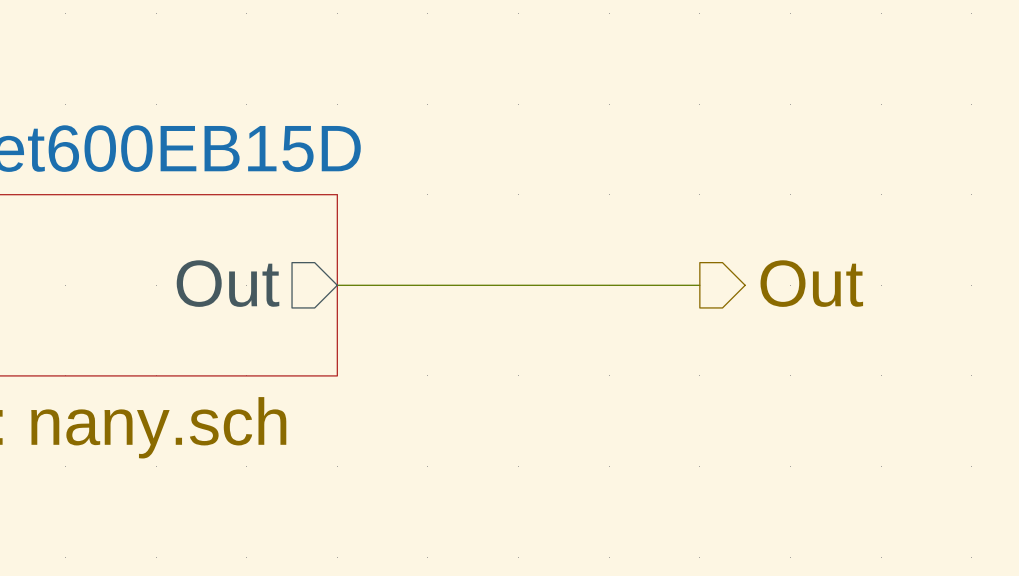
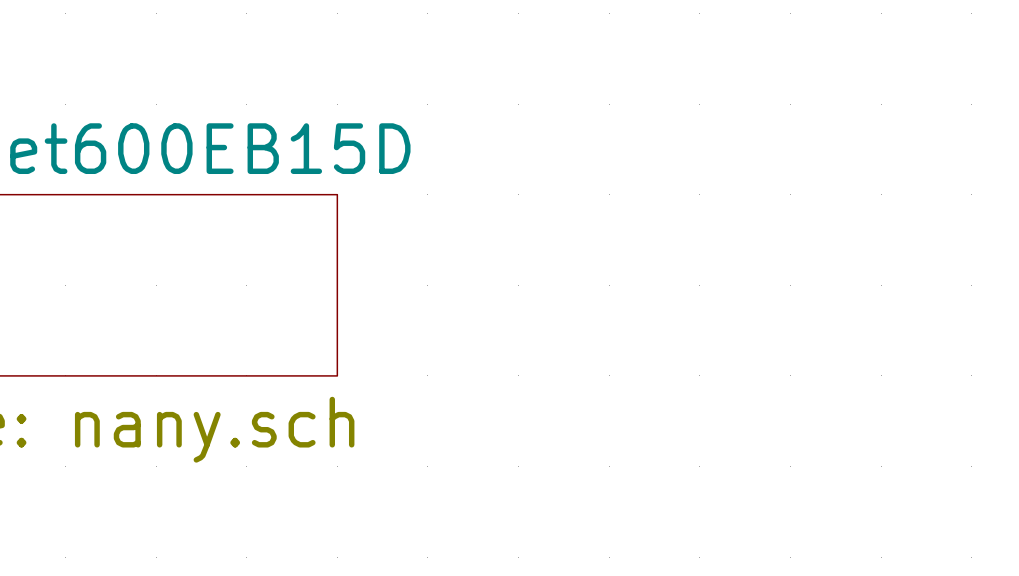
sheet pin: Out (228, 283) -> none
hierarchical label: Out (811, 283) -> none
wire: (337, 285) (699, 285) -> none

